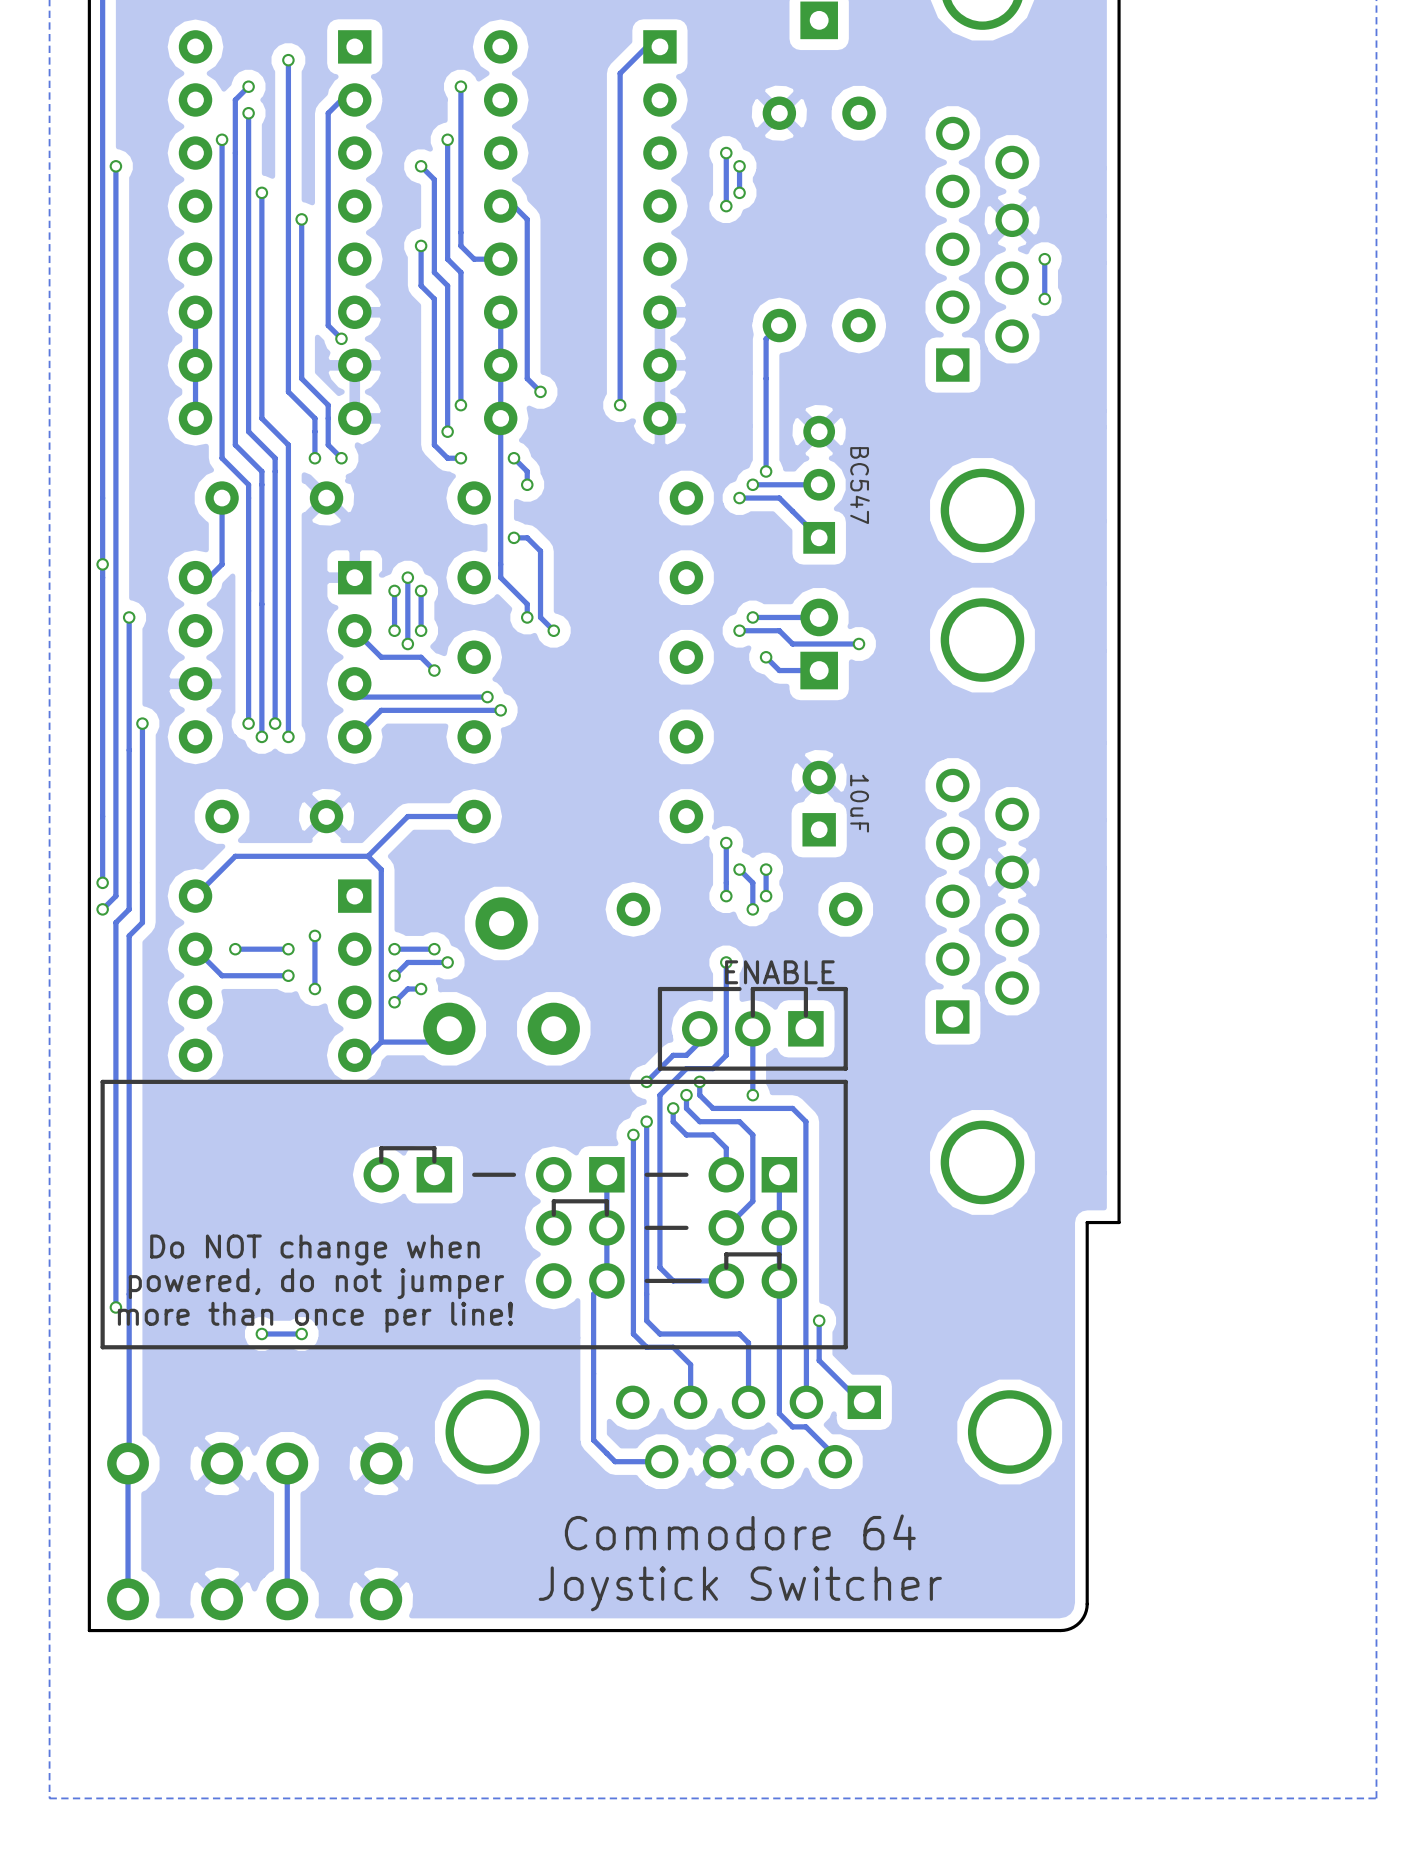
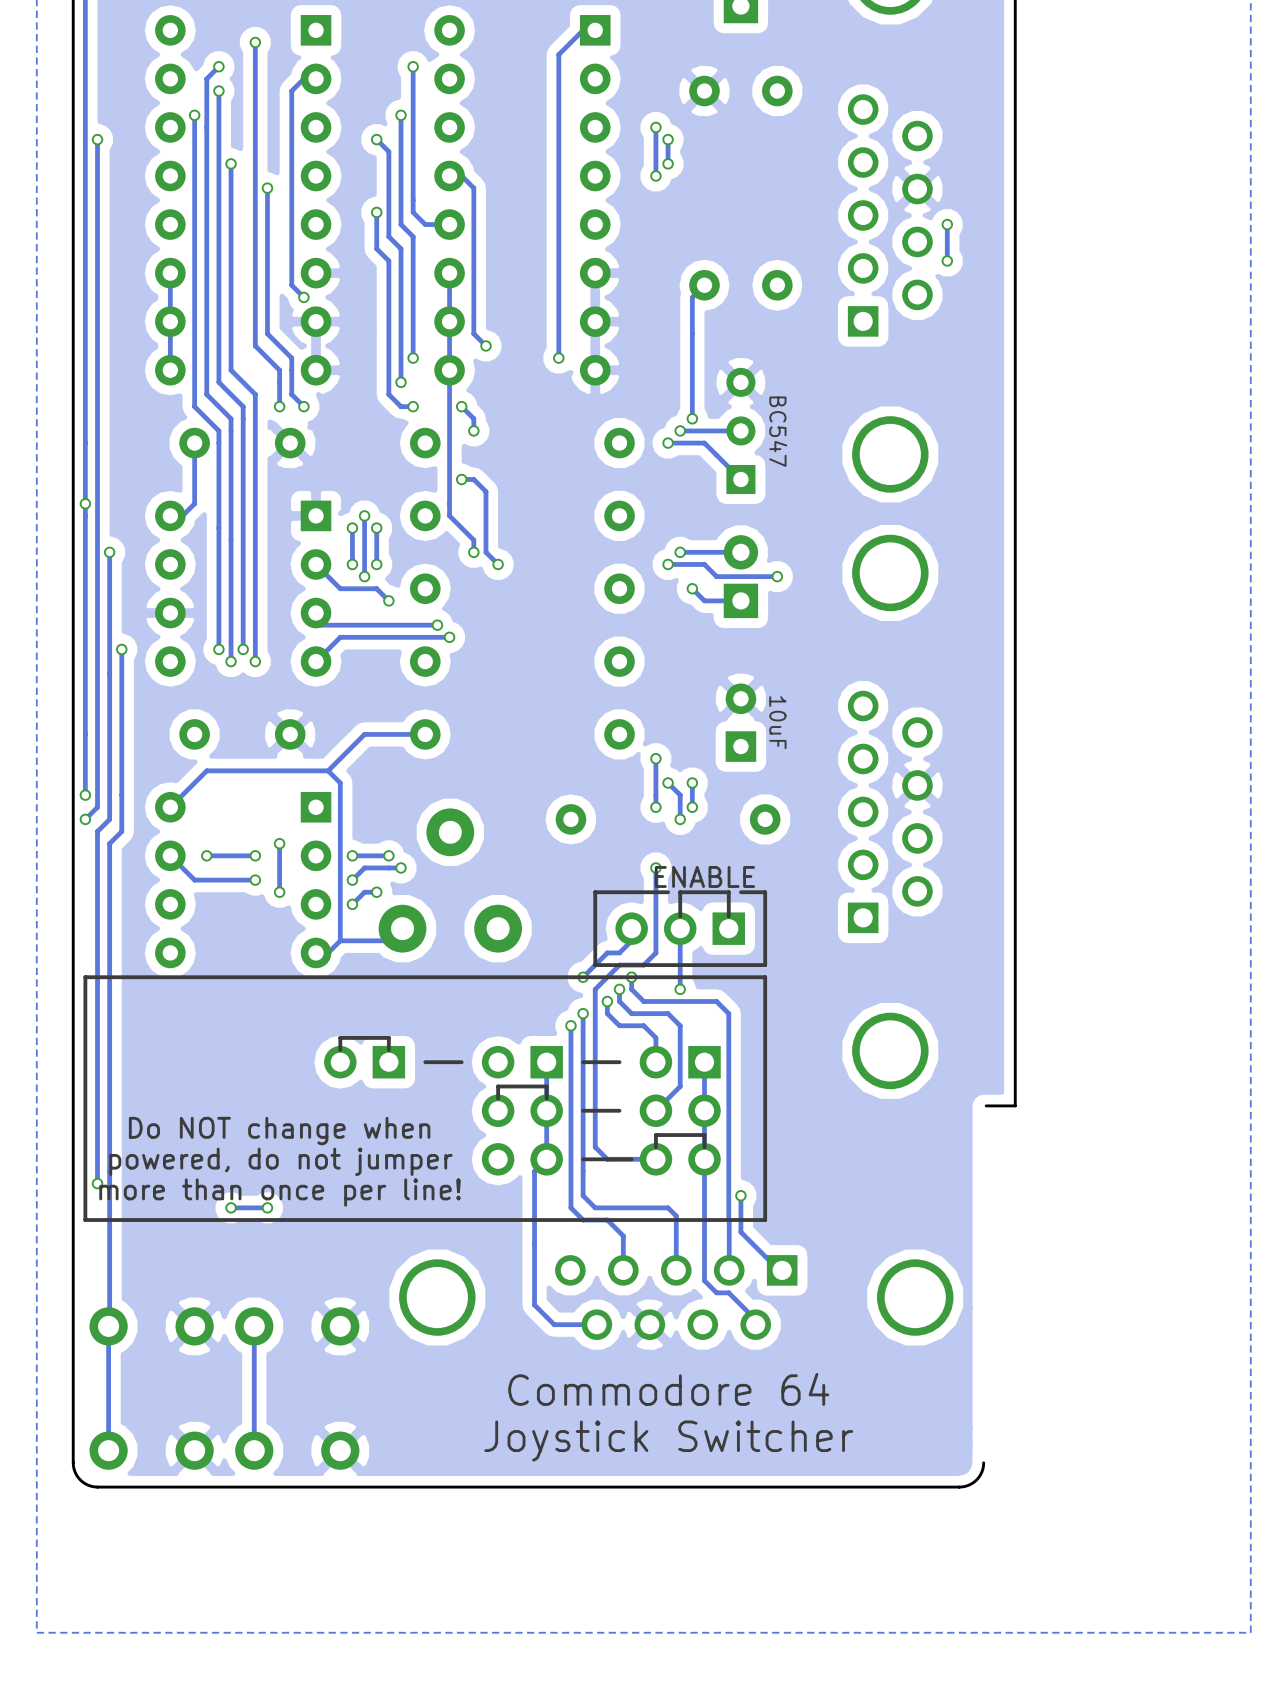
board edge: (1087, 1222) (1087, 1604) (1083, 1617) (1070, 1628) (1060, 1630) (89, 1630) (89, 1612) -> (983, 1462) (981, 1472) (976, 1479) (968, 1485) (959, 1487) (97, 1487) (88, 1485) (80, 1479) (75, 1472) (73, 1462)

